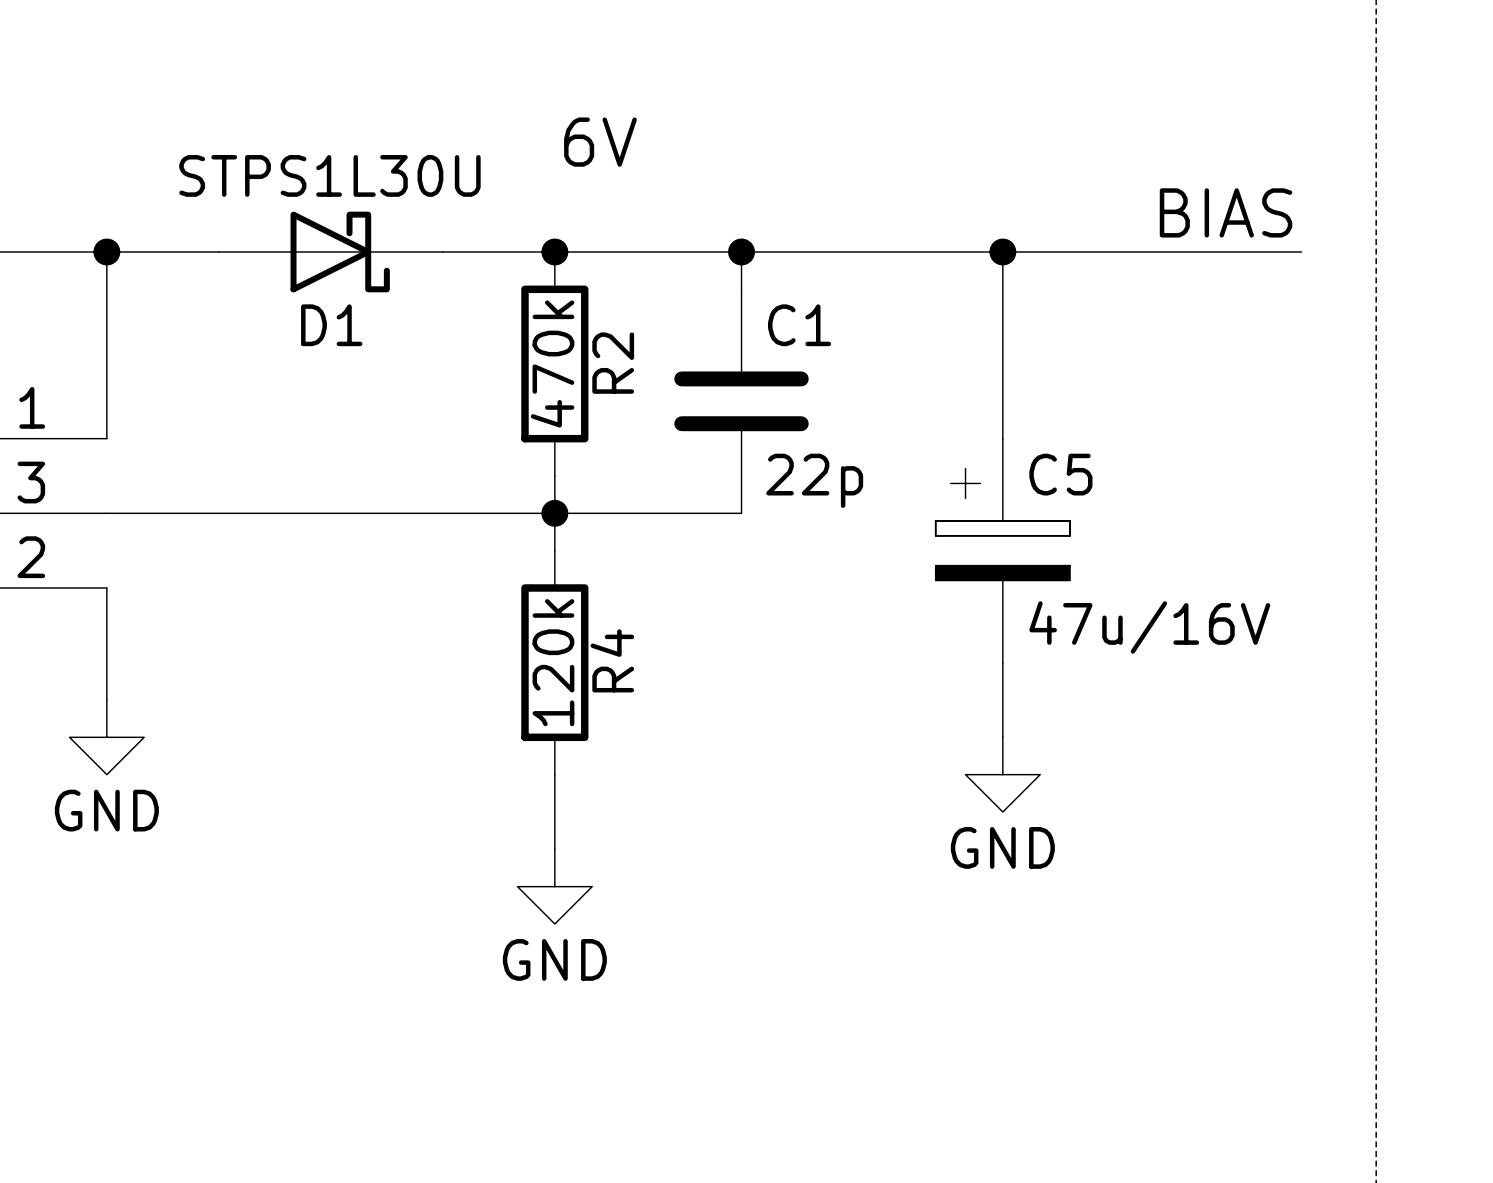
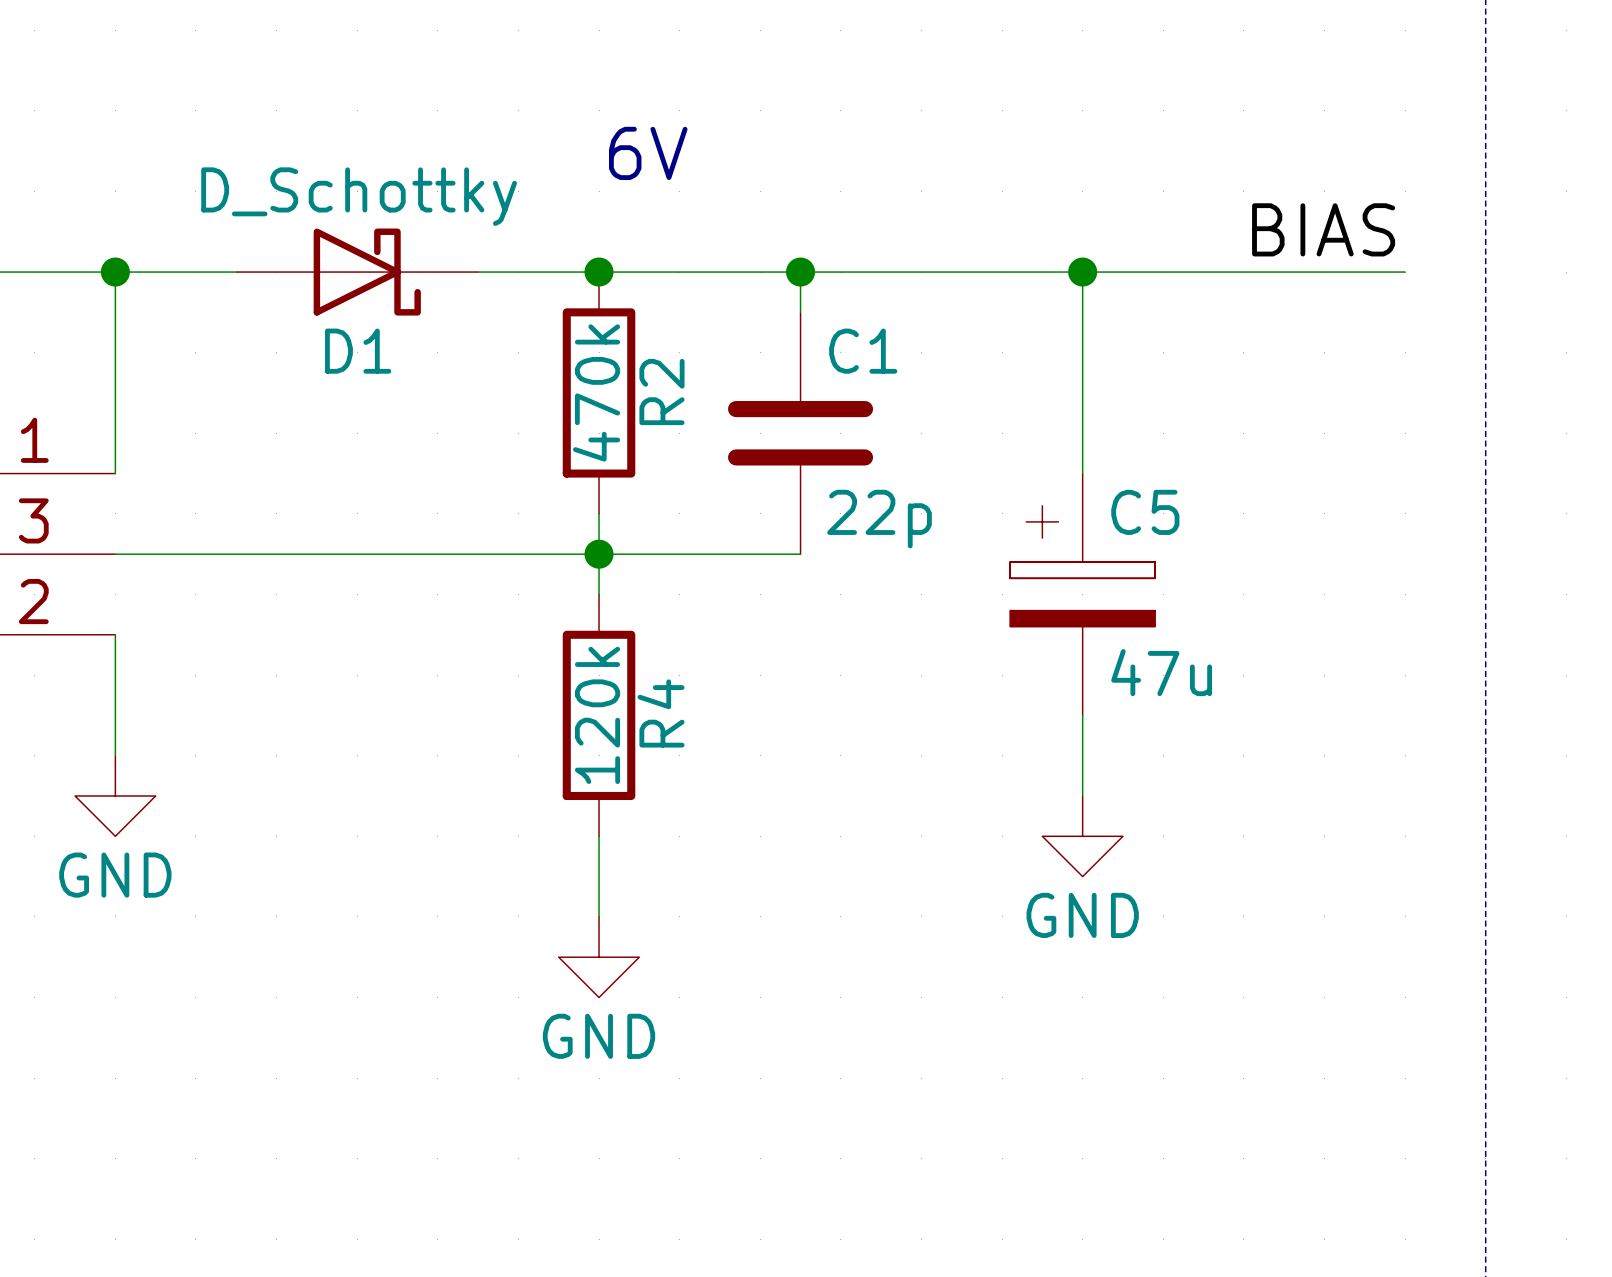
D1 value: STPS1L30U (329, 175) -> D_Schottky (359, 196)
C5 value: 47u/16V (1149, 627) -> 47u (1161, 672)

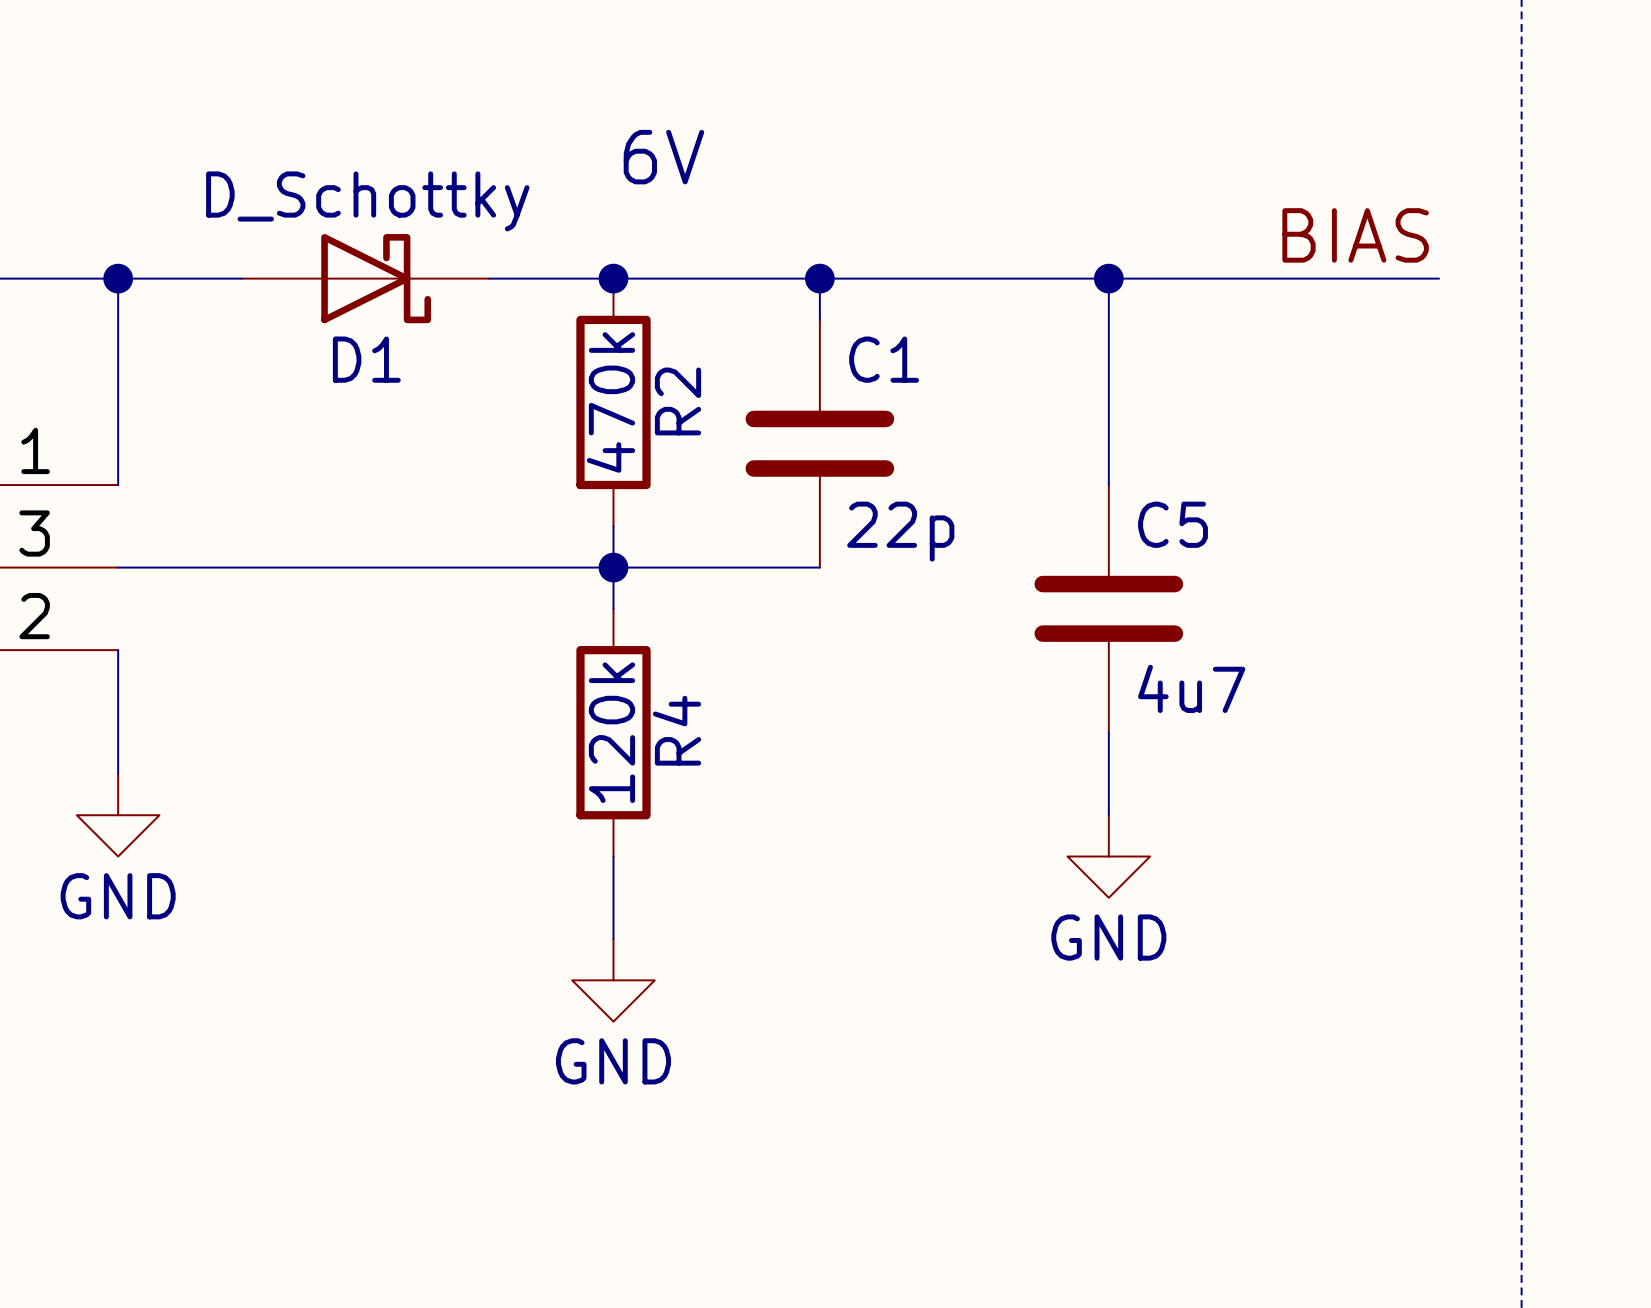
C5 symbol: [1010, 473, 1156, 716] -> [1034, 485, 1184, 733]
C5 value: 47u (1161, 672) -> 4u7 (1191, 688)

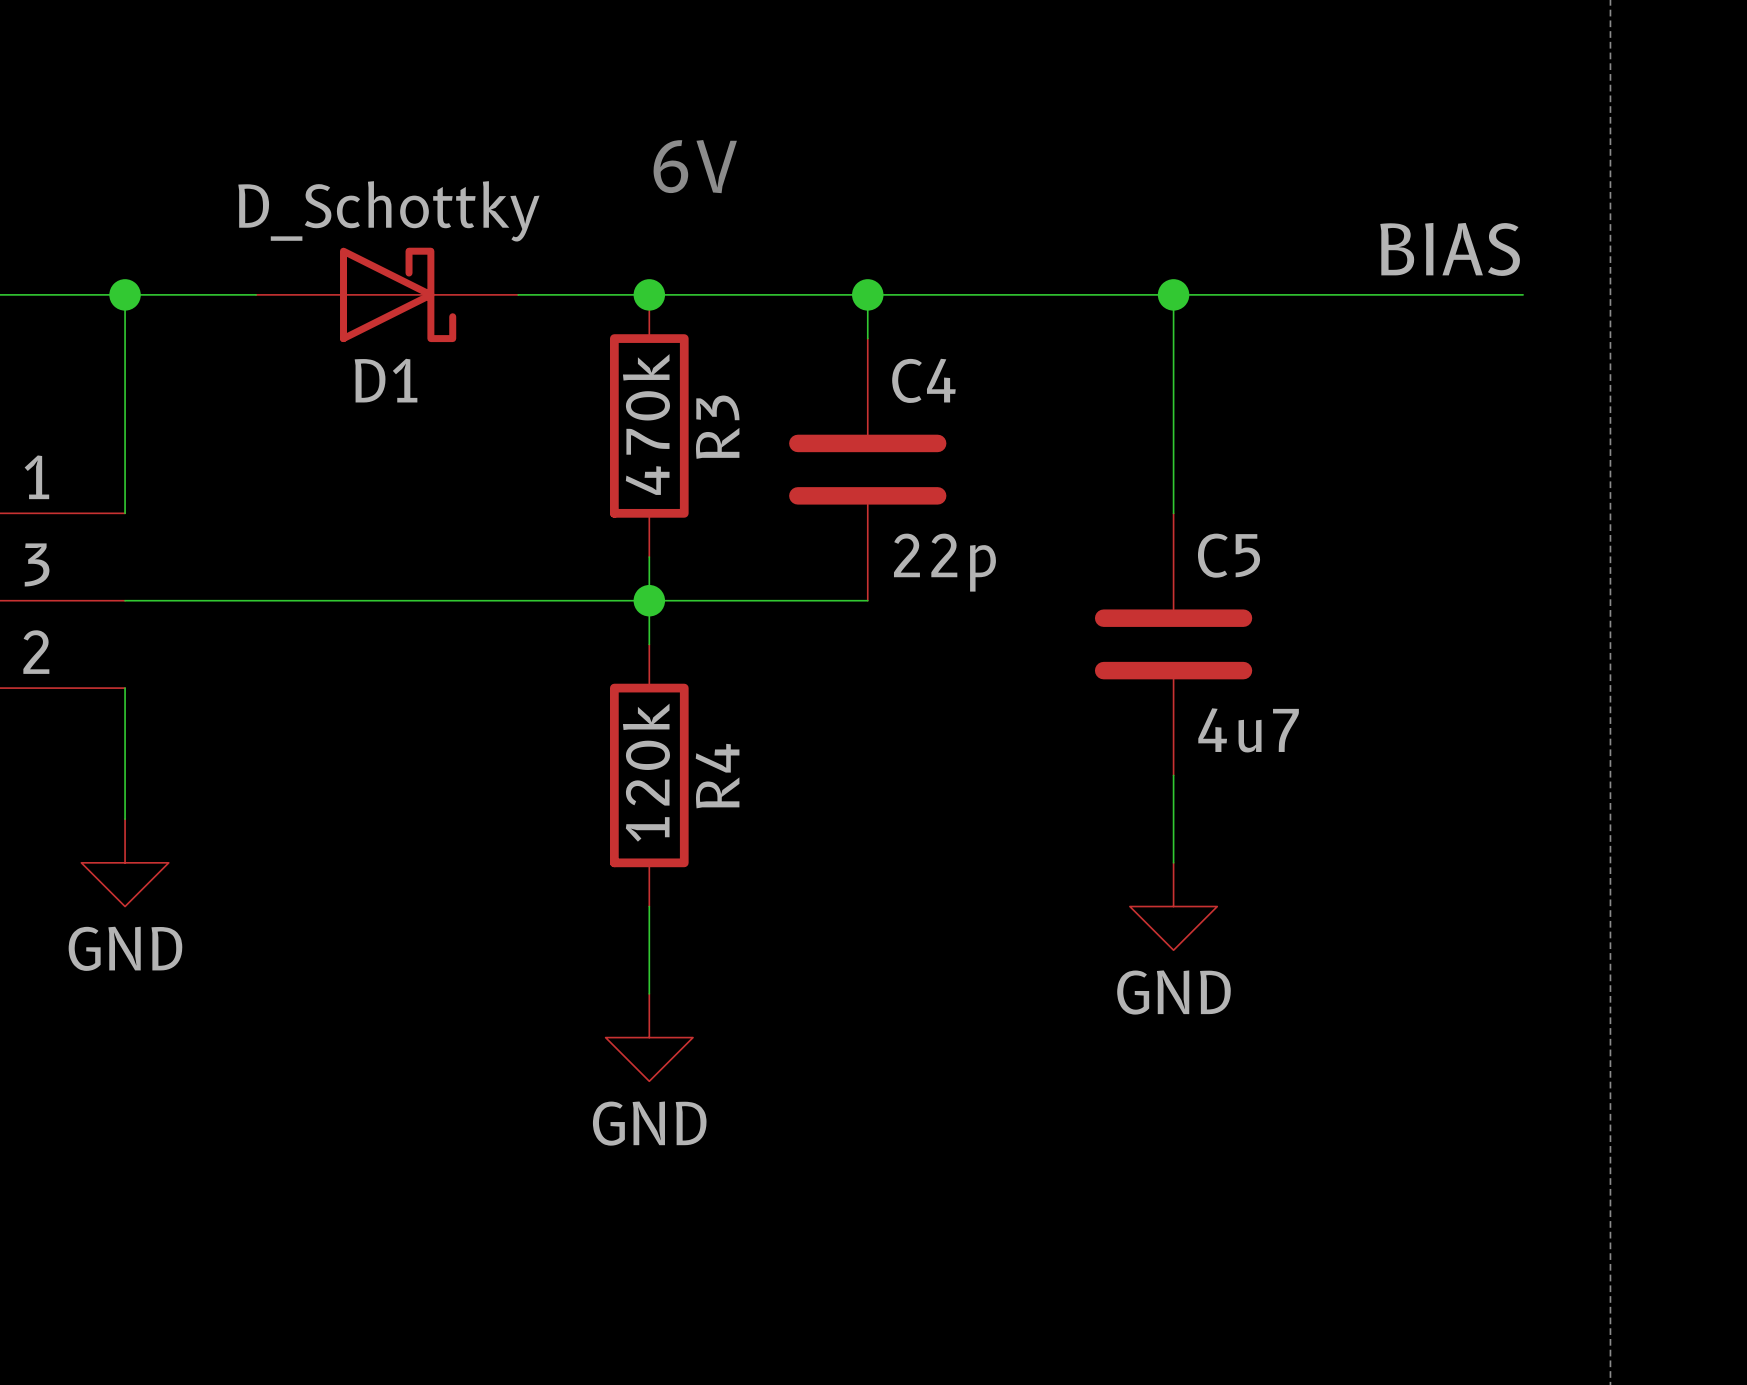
C1 name: C1 (884, 359) -> C4 (923, 380)
R2 name: R2 (677, 401) -> R3 (717, 427)

